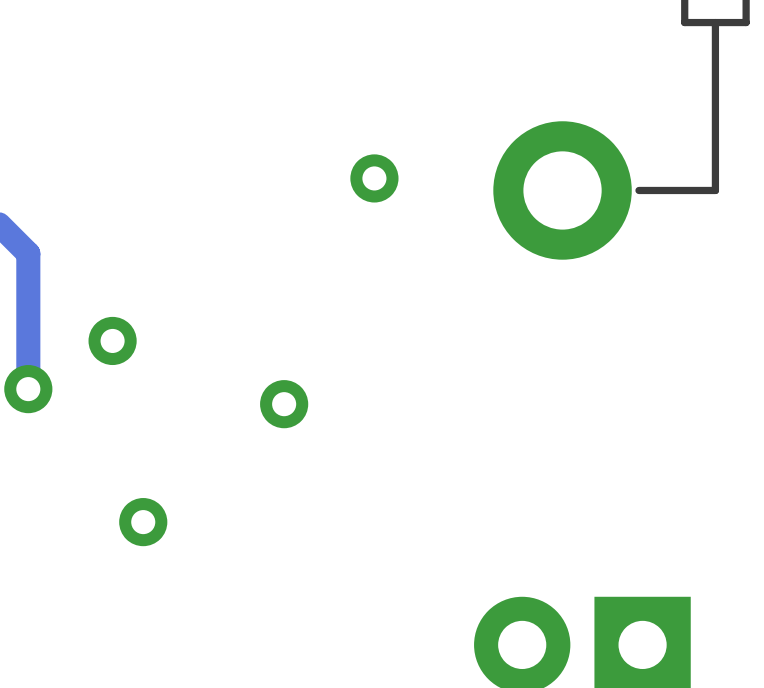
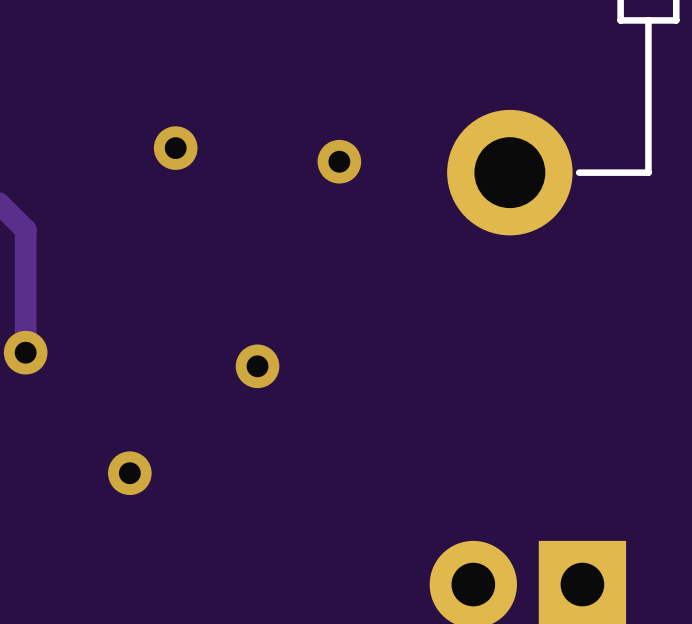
via position: (112, 340) -> (175, 148)

